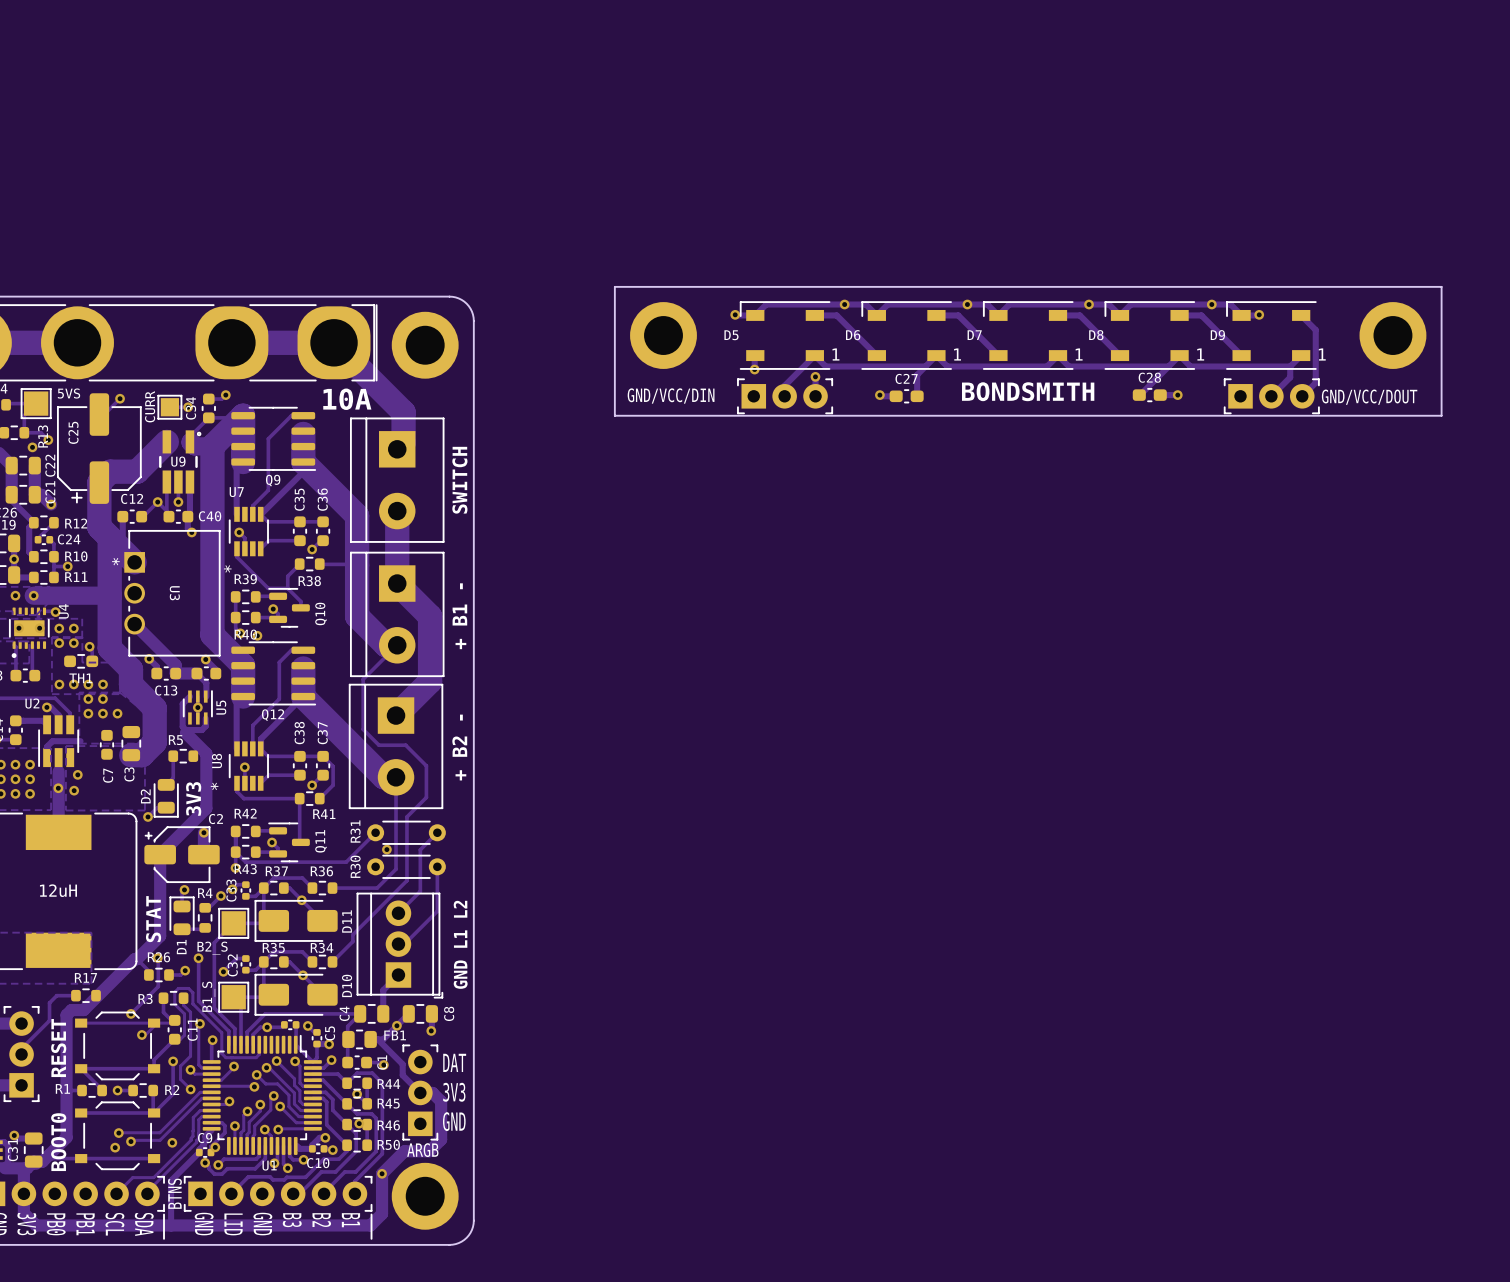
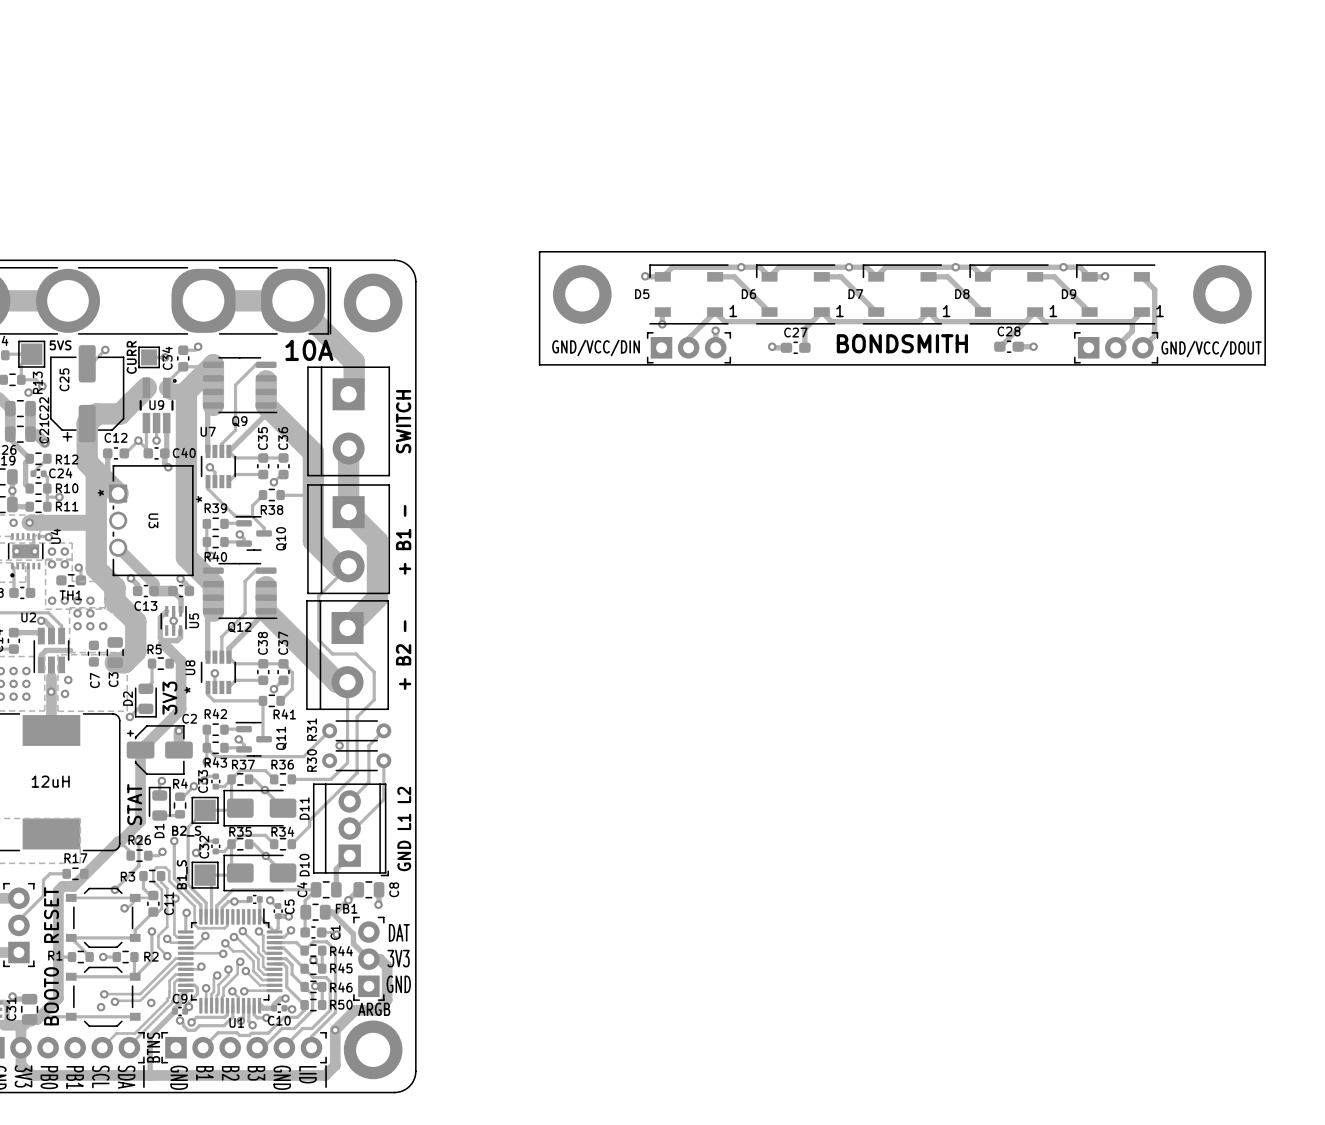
via: (257, 635) -> none
text: B2 (321, 1220) -> GND (282, 1077)
text: B1 (350, 1220) -> LID (308, 1074)
text: LID (233, 1224) -> B1 (204, 1073)
text: GND (262, 1224) -> B2 (230, 1073)

